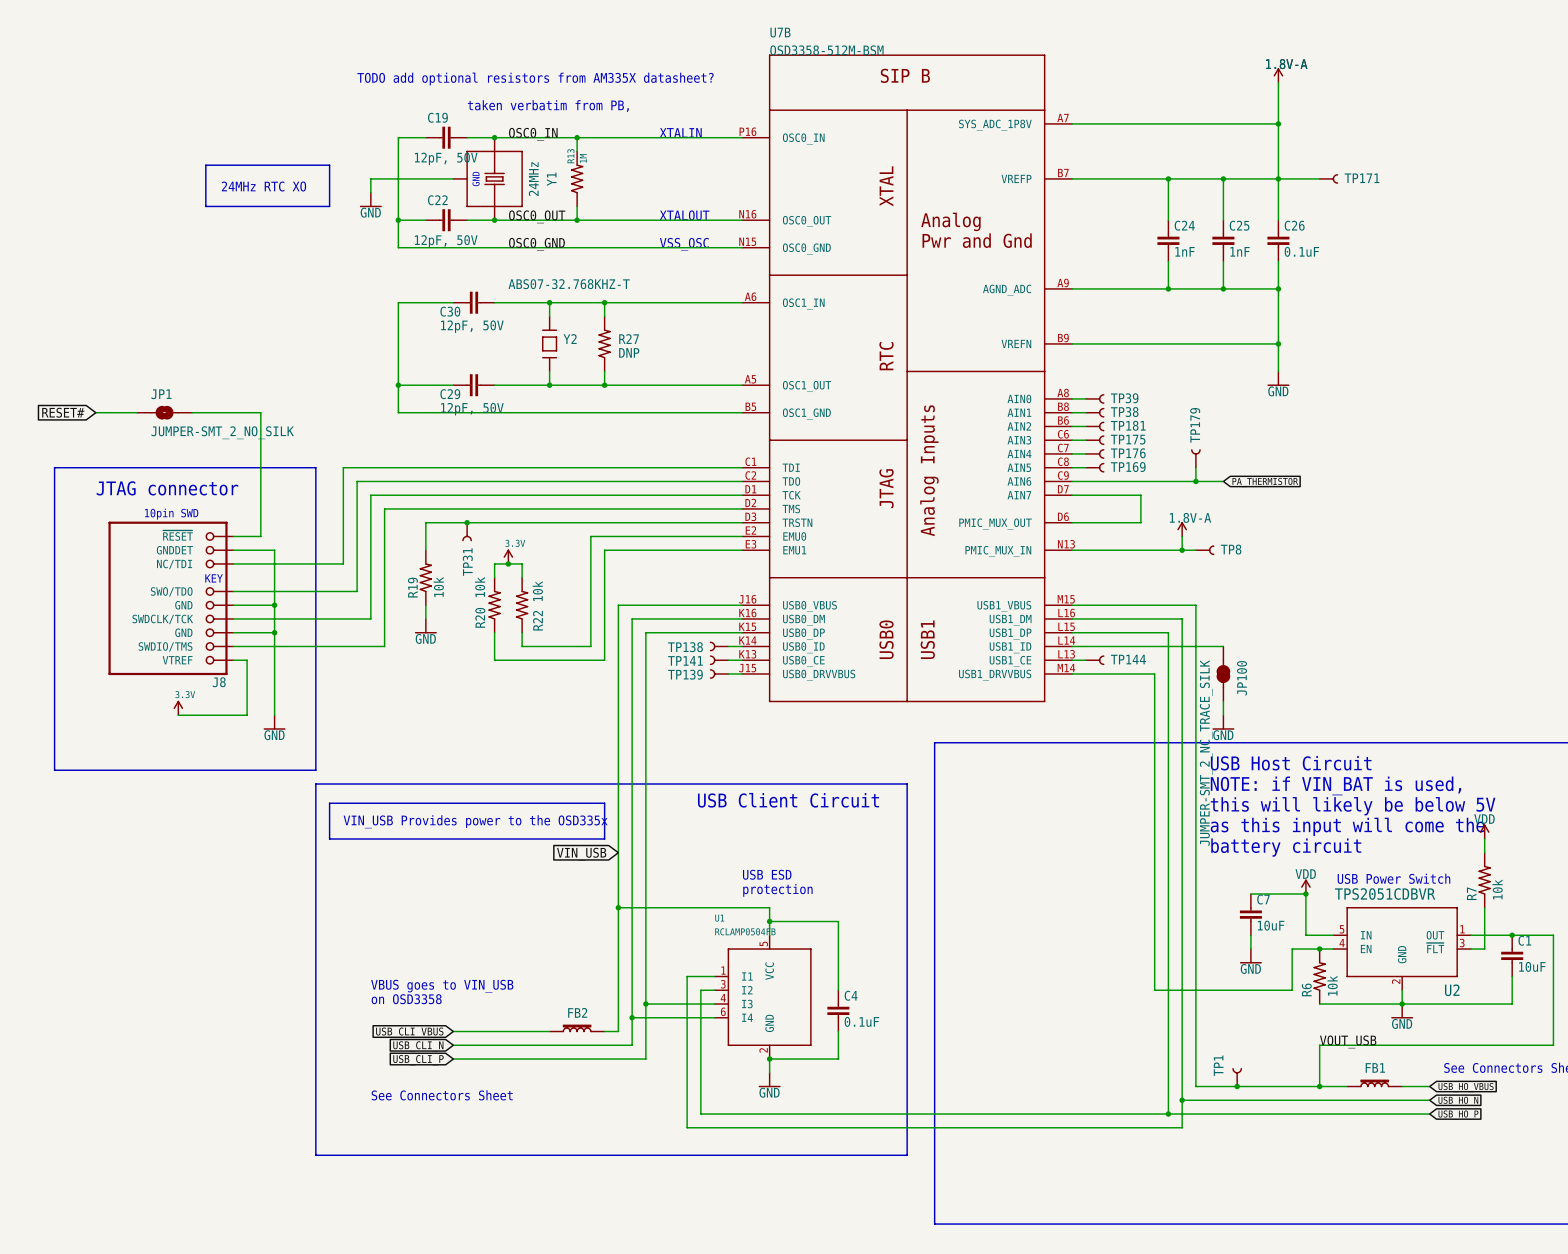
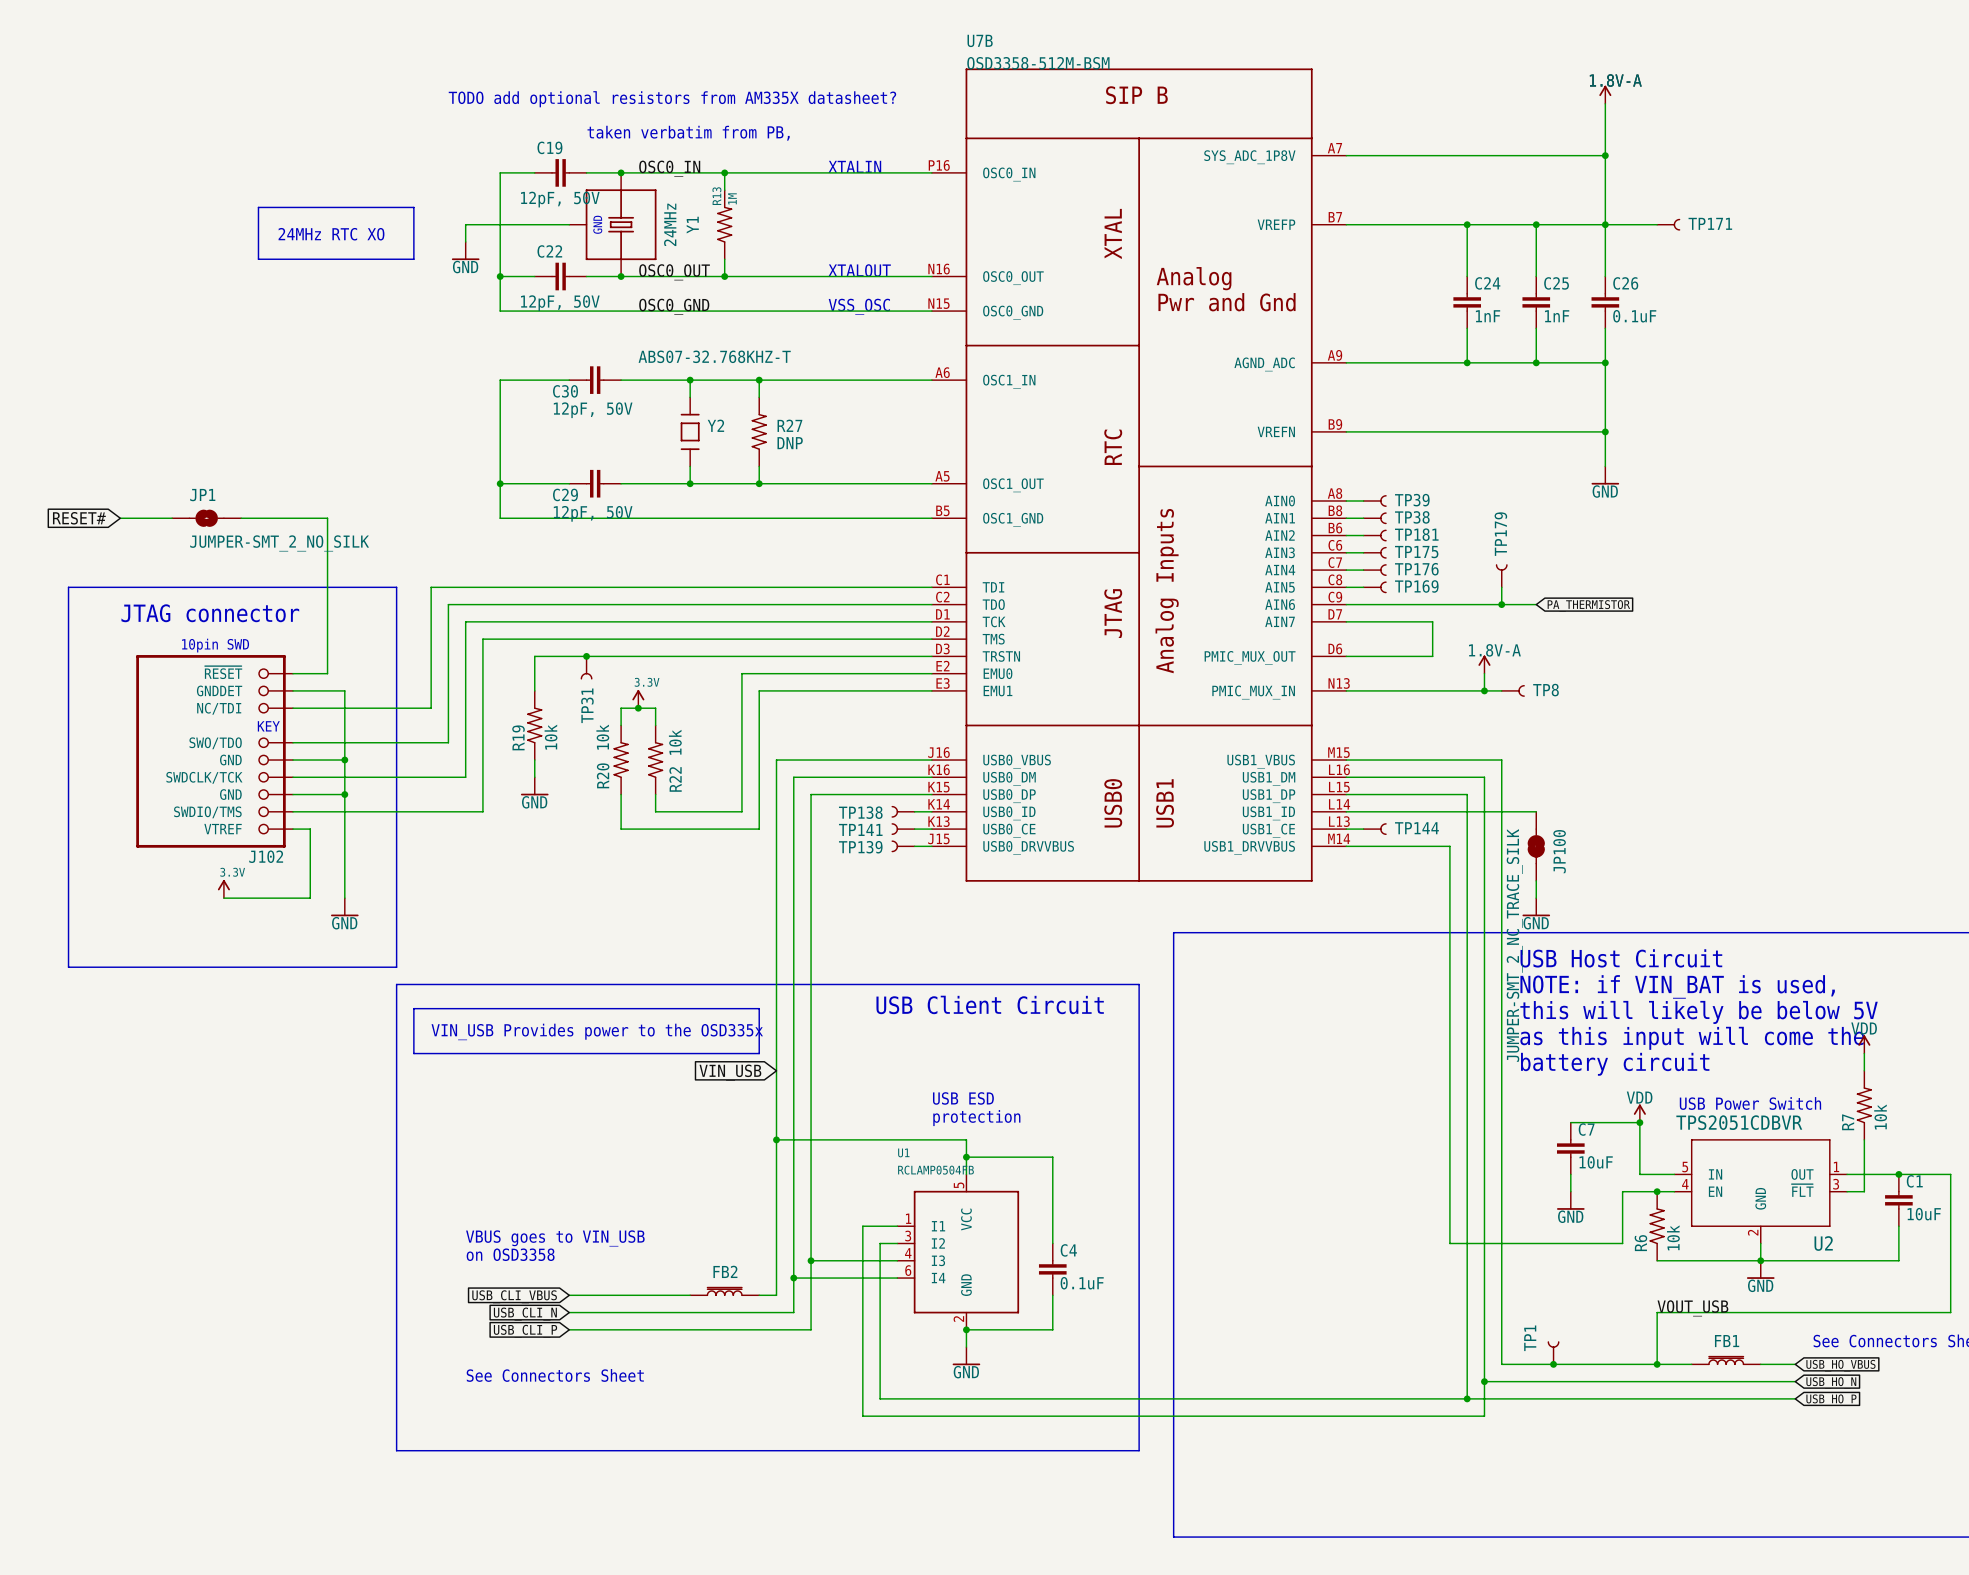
J8 name: J8 (219, 682) -> J102 (266, 856)

